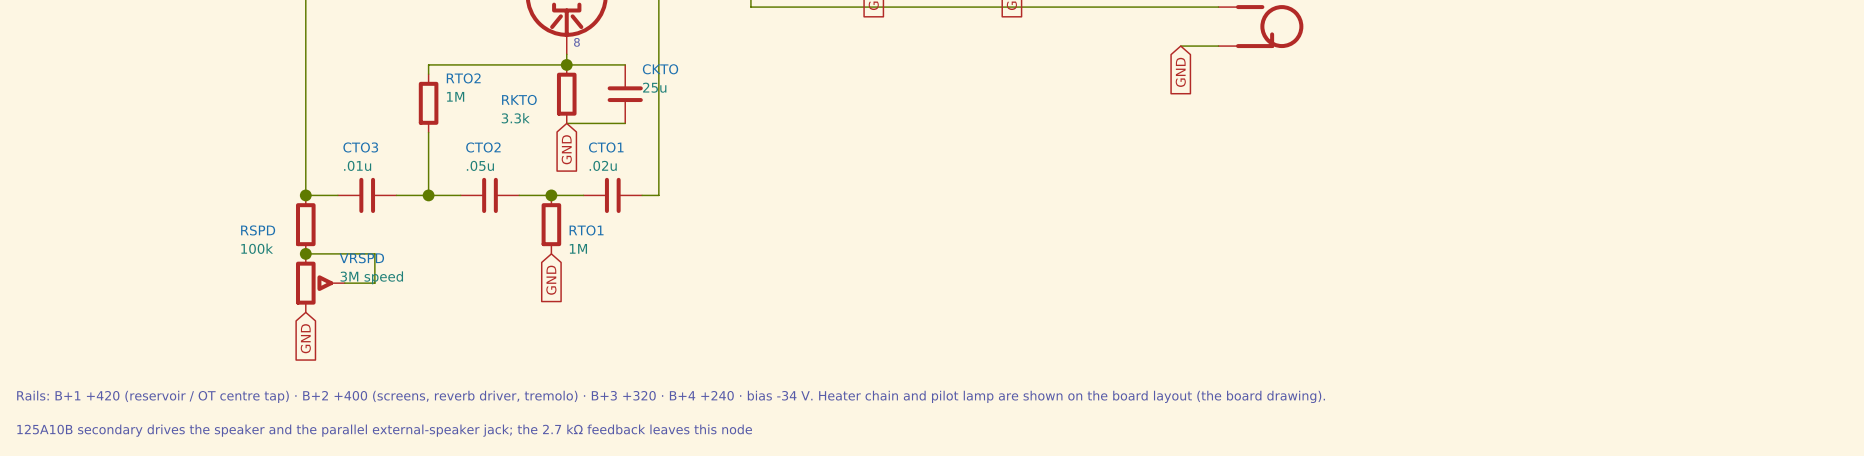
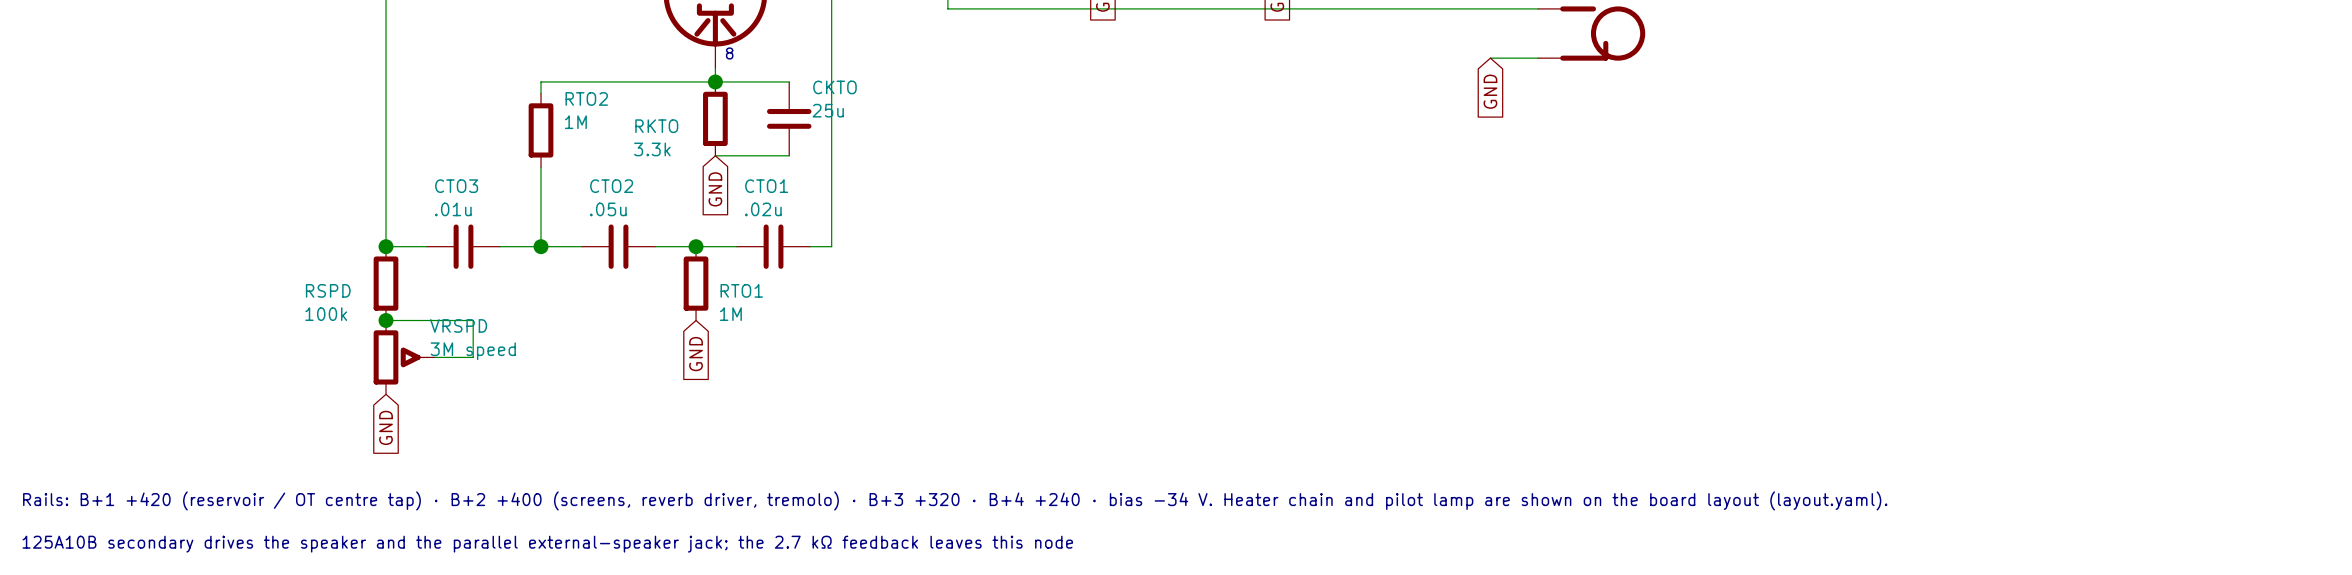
text: Rails: B+1 +420 (reservoir / OT centre tap) · B+2 +400 (screens, reverb driver, tremolo) · B+3 +320 · B+4 +240 · bias -34 V. Heater chain and pilot lamp are shown on the board layout (the board drawing). (671, 396) -> Rails: B+1 +420 (reservoir / OT centre tap) · B+2 +400 (screens, reverb driver, tremolo) · B+3 +320 · B+4 +240 · bias -34 V. Heater chain and pilot lamp are shown on the board layout (layout.yaml). (955, 500)

